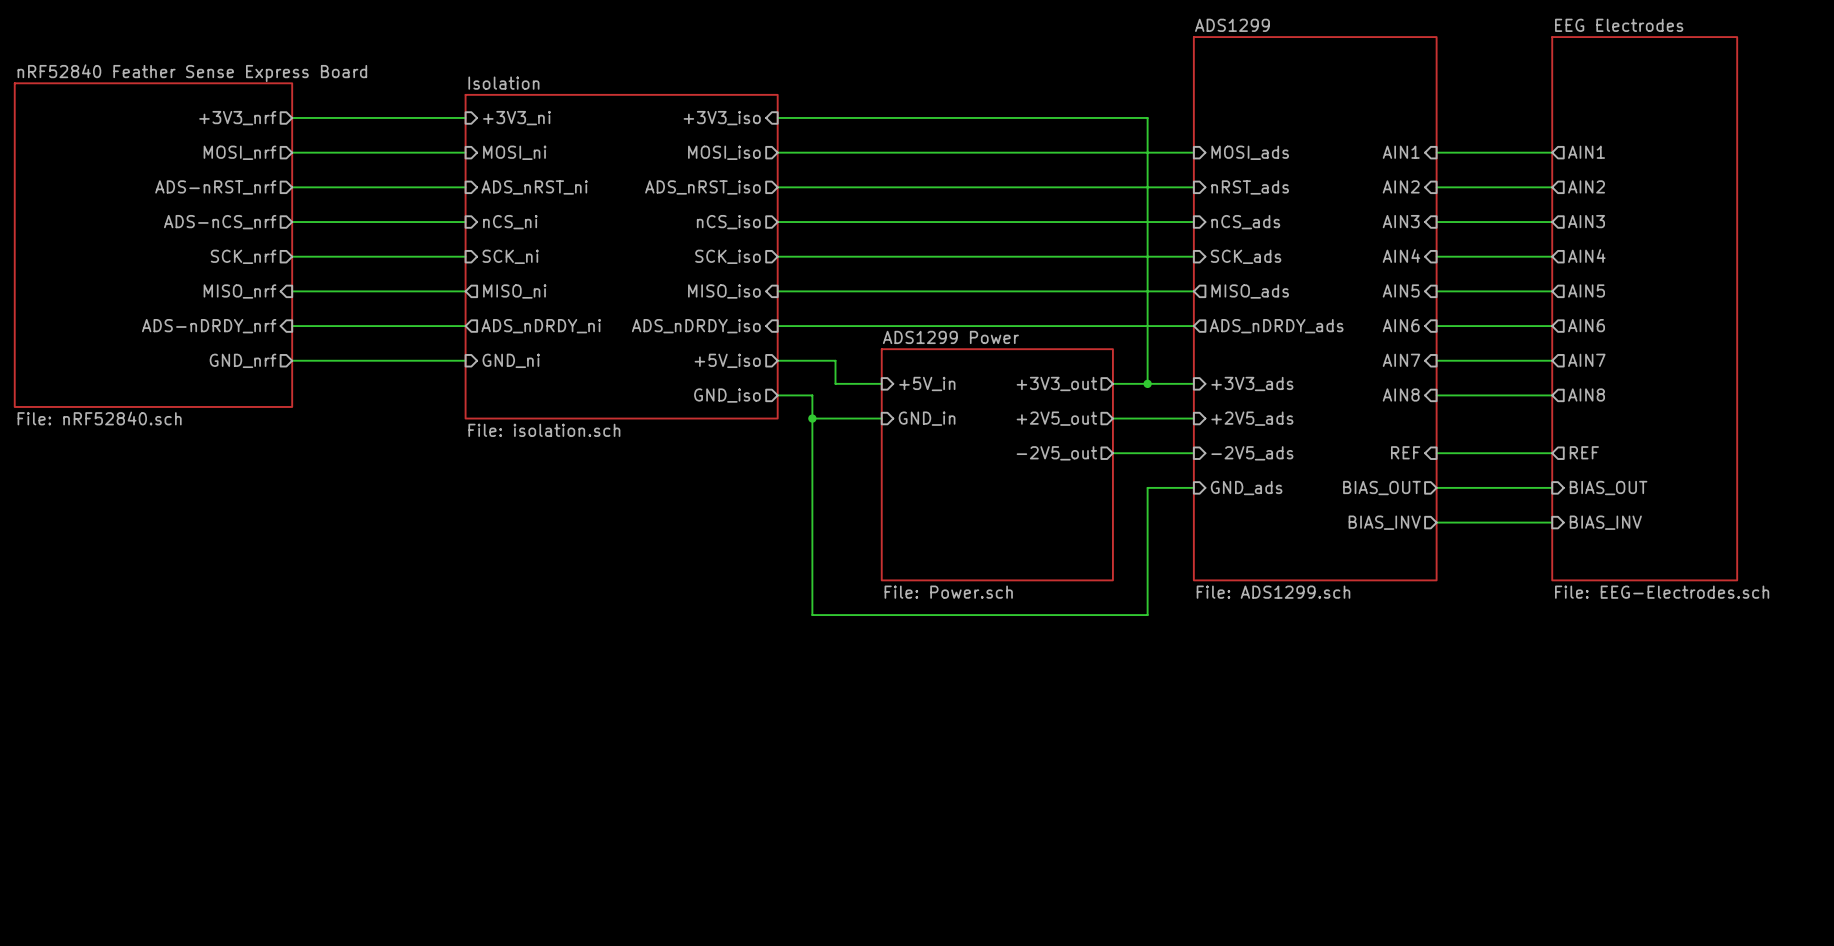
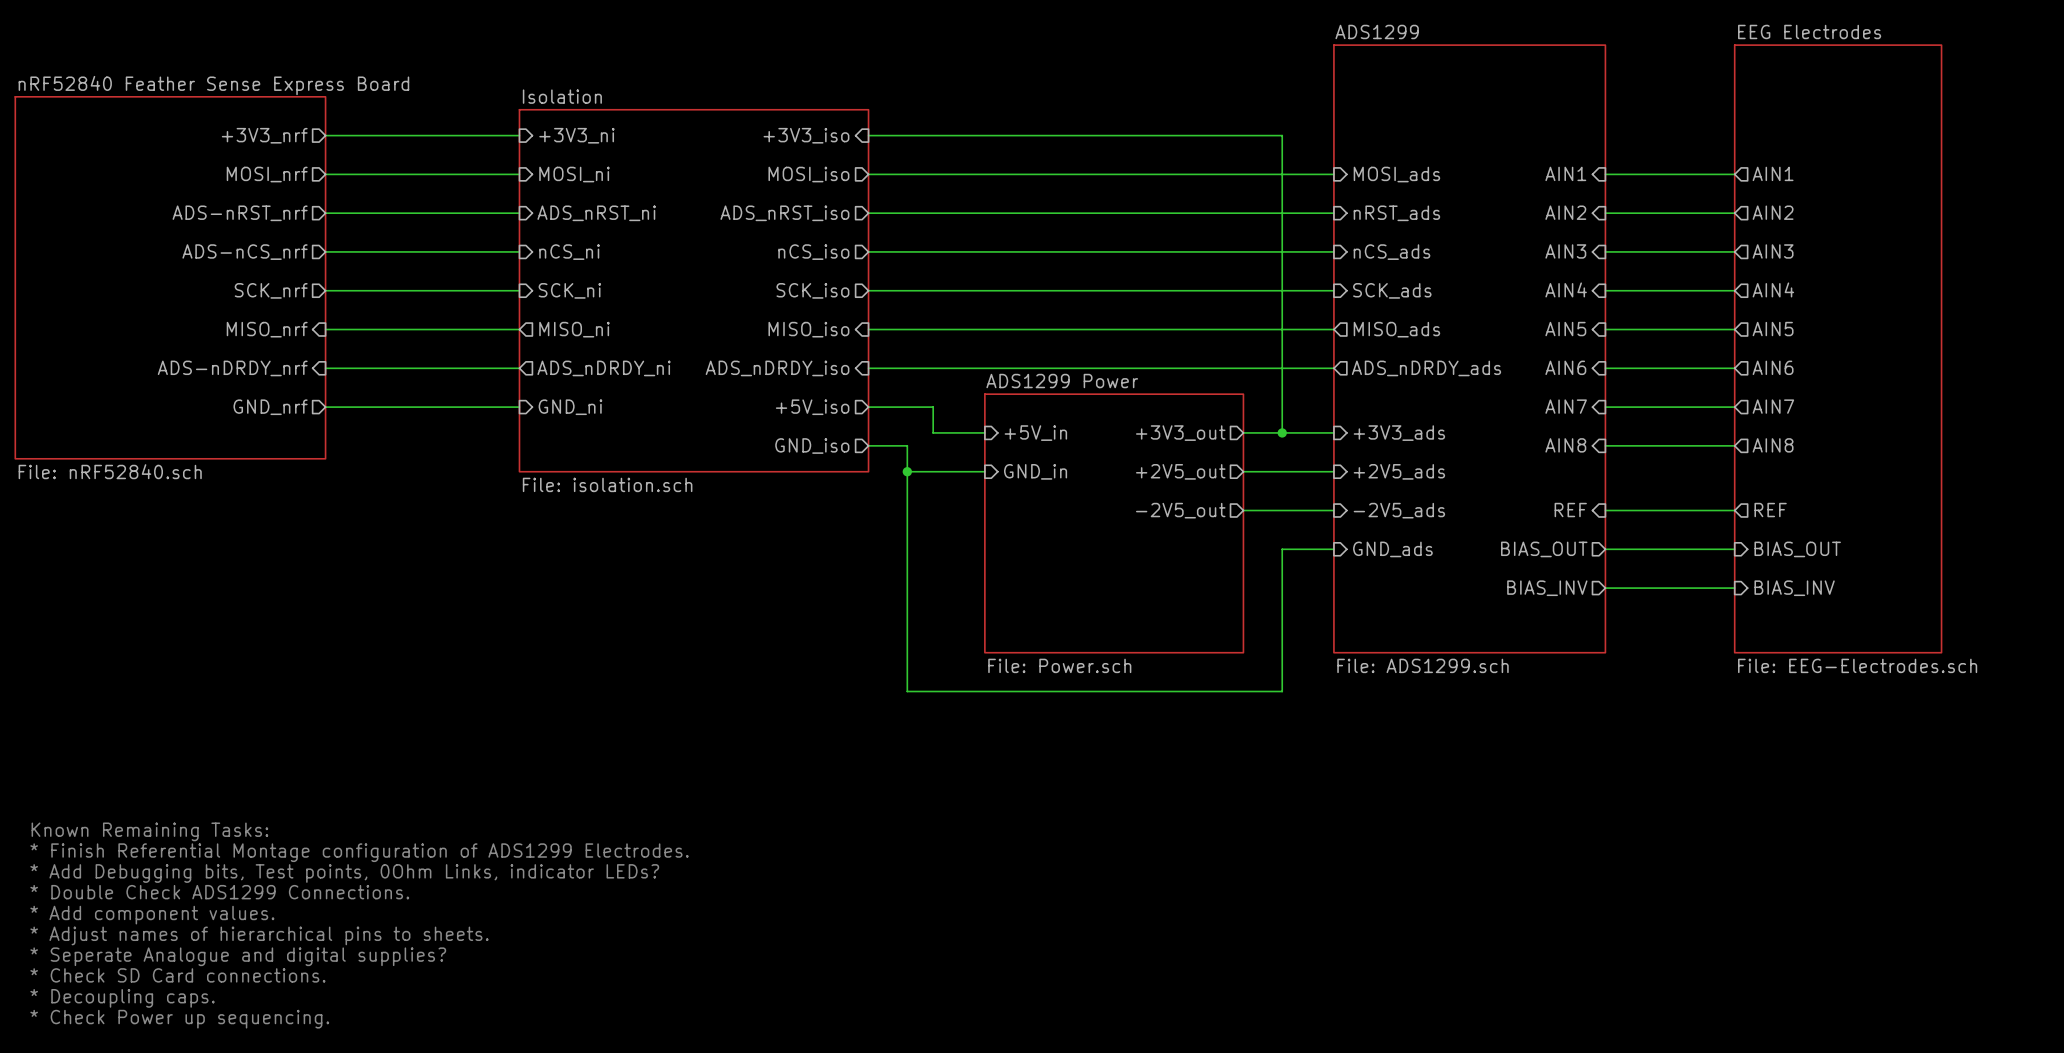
text: none -> Known Remaining Tasks: (149, 831)
text: none -> * Finish Referential Montage configuration of ADS1299 Electrodes. (359, 852)
text: none -> * Add Debugging bits, Test points, 0Ohm Links, indicator LEDs? (344, 873)
text: none -> * Double Check ADS1299 Connections. (219, 892)
text: none -> * Add component values. (152, 915)
text: none -> * Adjust names of hierarchical pins to sheets. (259, 935)
text: none -> * Seperate Analogue and digital supplies? (238, 956)
text: none -> * Check SD Card connections. (177, 975)
text: none -> * Decoupling caps. (122, 998)
text: none -> * Check Power up sequencing. (179, 1019)

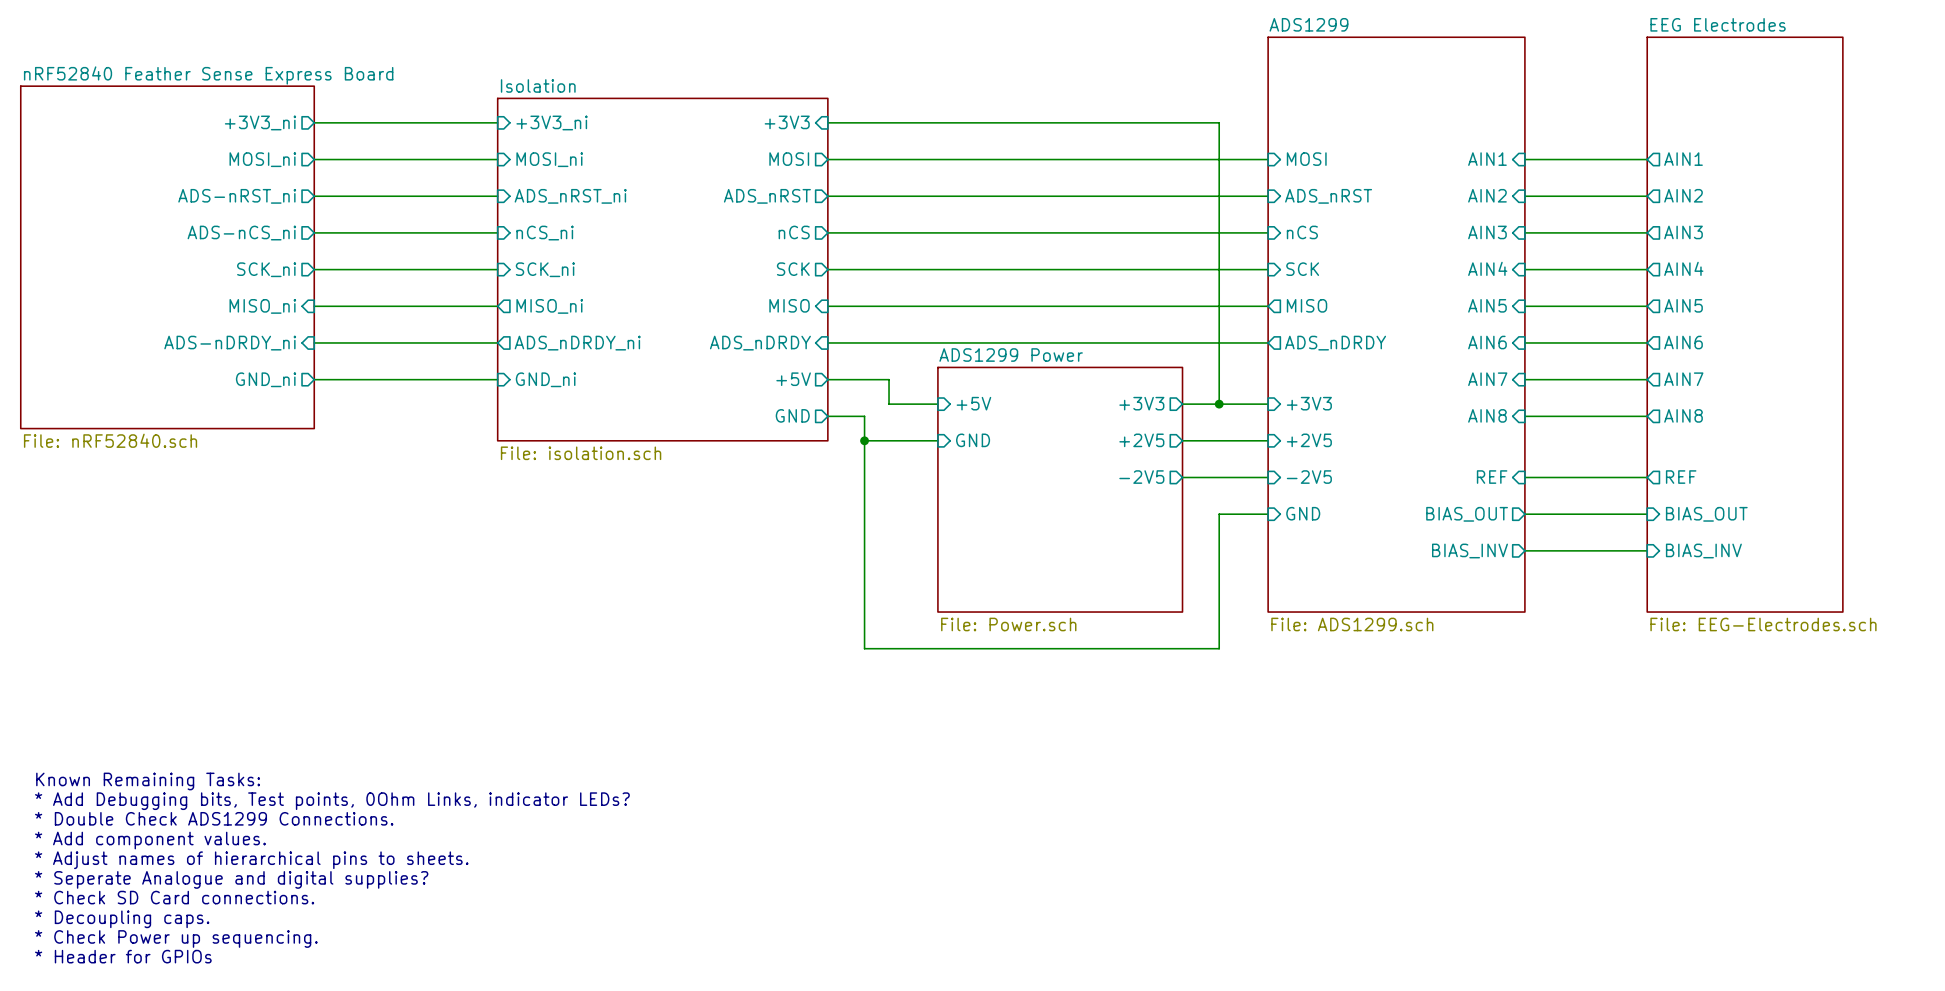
sheet pin: +3V3_nrf (264, 135) -> +3V3_ni (260, 122)
sheet pin: +3V3_iso (806, 135) -> +3V3 (787, 122)
sheet pin: MOSI_nrf (267, 174) -> MOSI_ni (262, 159)
sheet pin: MOSI_iso (808, 174) -> MOSI (789, 159)
sheet pin: MOSI_ads (1396, 174) -> MOSI (1306, 159)
sheet pin: ADS-nRST_nrf (240, 213) -> ADS-nRST_ni (237, 196)
sheet pin: ADS_nRST_iso (784, 213) -> ADS_nRST (767, 196)
sheet pin: nRST_ads (1396, 213) -> ADS_nRST (1328, 196)
sheet pin: ADS-nCS_nrf (245, 252) -> ADS-nCS_ni (241, 233)
sheet pin: nCS_iso (813, 252) -> nCS (794, 232)
sheet pin: nCS_ads (1392, 252) -> nCS (1302, 232)
sheet pin: SCK_nrf (271, 290) -> SCK_ni (266, 269)
sheet pin: SCK_iso (812, 290) -> SCK (793, 269)
sheet pin: SCK_ads (1392, 290) -> SCK (1302, 269)
sheet pin: MISO_nrf (267, 329) -> MISO_ni (262, 306)
sheet pin: MISO_iso (808, 329) -> MISO (789, 305)
sheet pin: MISO_ads (1396, 329) -> MISO (1307, 305)
sheet pin: ADS-nDRDY_nrf (232, 368) -> ADS-nDRDY_ni (230, 343)
sheet pin: ADS_nDRDY_iso (777, 368) -> ADS_nDRDY (760, 343)
sheet pin: ADS_nDRDY_ads (1426, 368) -> ADS_nDRDY (1335, 343)
sheet pin: GND_nrf (270, 407) -> GND_ni (266, 379)
sheet pin: +5V_iso (812, 407) -> +5V (793, 379)
sheet pin: +5V_in (1035, 433) -> +5V (973, 403)
sheet pin: +3V3_out (1180, 433) -> +3V3 (1141, 403)
sheet pin: +3V3_ads (1399, 433) -> +3V3 (1309, 403)
sheet pin: GND_iso (812, 446) -> GND (792, 415)
sheet pin: GND_in (1035, 471) -> GND (973, 440)
sheet pin: +2V5_out (1180, 471) -> +2V5 (1141, 440)
sheet pin: +2V5_ads (1399, 471) -> +2V5 (1309, 440)
sheet pin: -2V5_out (1180, 510) -> -2V5 (1141, 477)
sheet pin: -2V5_ads (1399, 510) -> -2V5 (1309, 477)
sheet pin: GND_ads (1392, 549) -> GND (1303, 513)
text: * Finish Referential Montage configuration of ADS1299 Electrodes. (359, 852) -> * Add Debugging bits, Test points, 0Ohm Links, indicator LEDs? (332, 801)
text: * Add Debugging bits, Test points, 0Ohm Links, indicator LEDs? (344, 873) -> * Double Check ADS1299 Connections. (214, 818)
text: * Double Check ADS1299 Connections. (219, 892) -> * Add component values. (150, 840)
text: * Add component values. (152, 915) -> * Adjust names of hierarchical pins to sheets. (251, 860)
text: * Adjust names of hierarchical pins to sheets. (259, 935) -> * Seperate Analogue and digital supplies? (231, 879)
text: * Seperate Analogue and digital supplies? (238, 956) -> * Check SD Card connections. (174, 897)
text: * Check SD Card connections. (177, 975) -> * Decoupling caps. (122, 919)
text: * Decoupling caps. (122, 998) -> * Check Power up sequencing. (176, 938)
text: * Check Power up sequencing. (179, 1019) -> * Header for GPIOs (123, 956)

